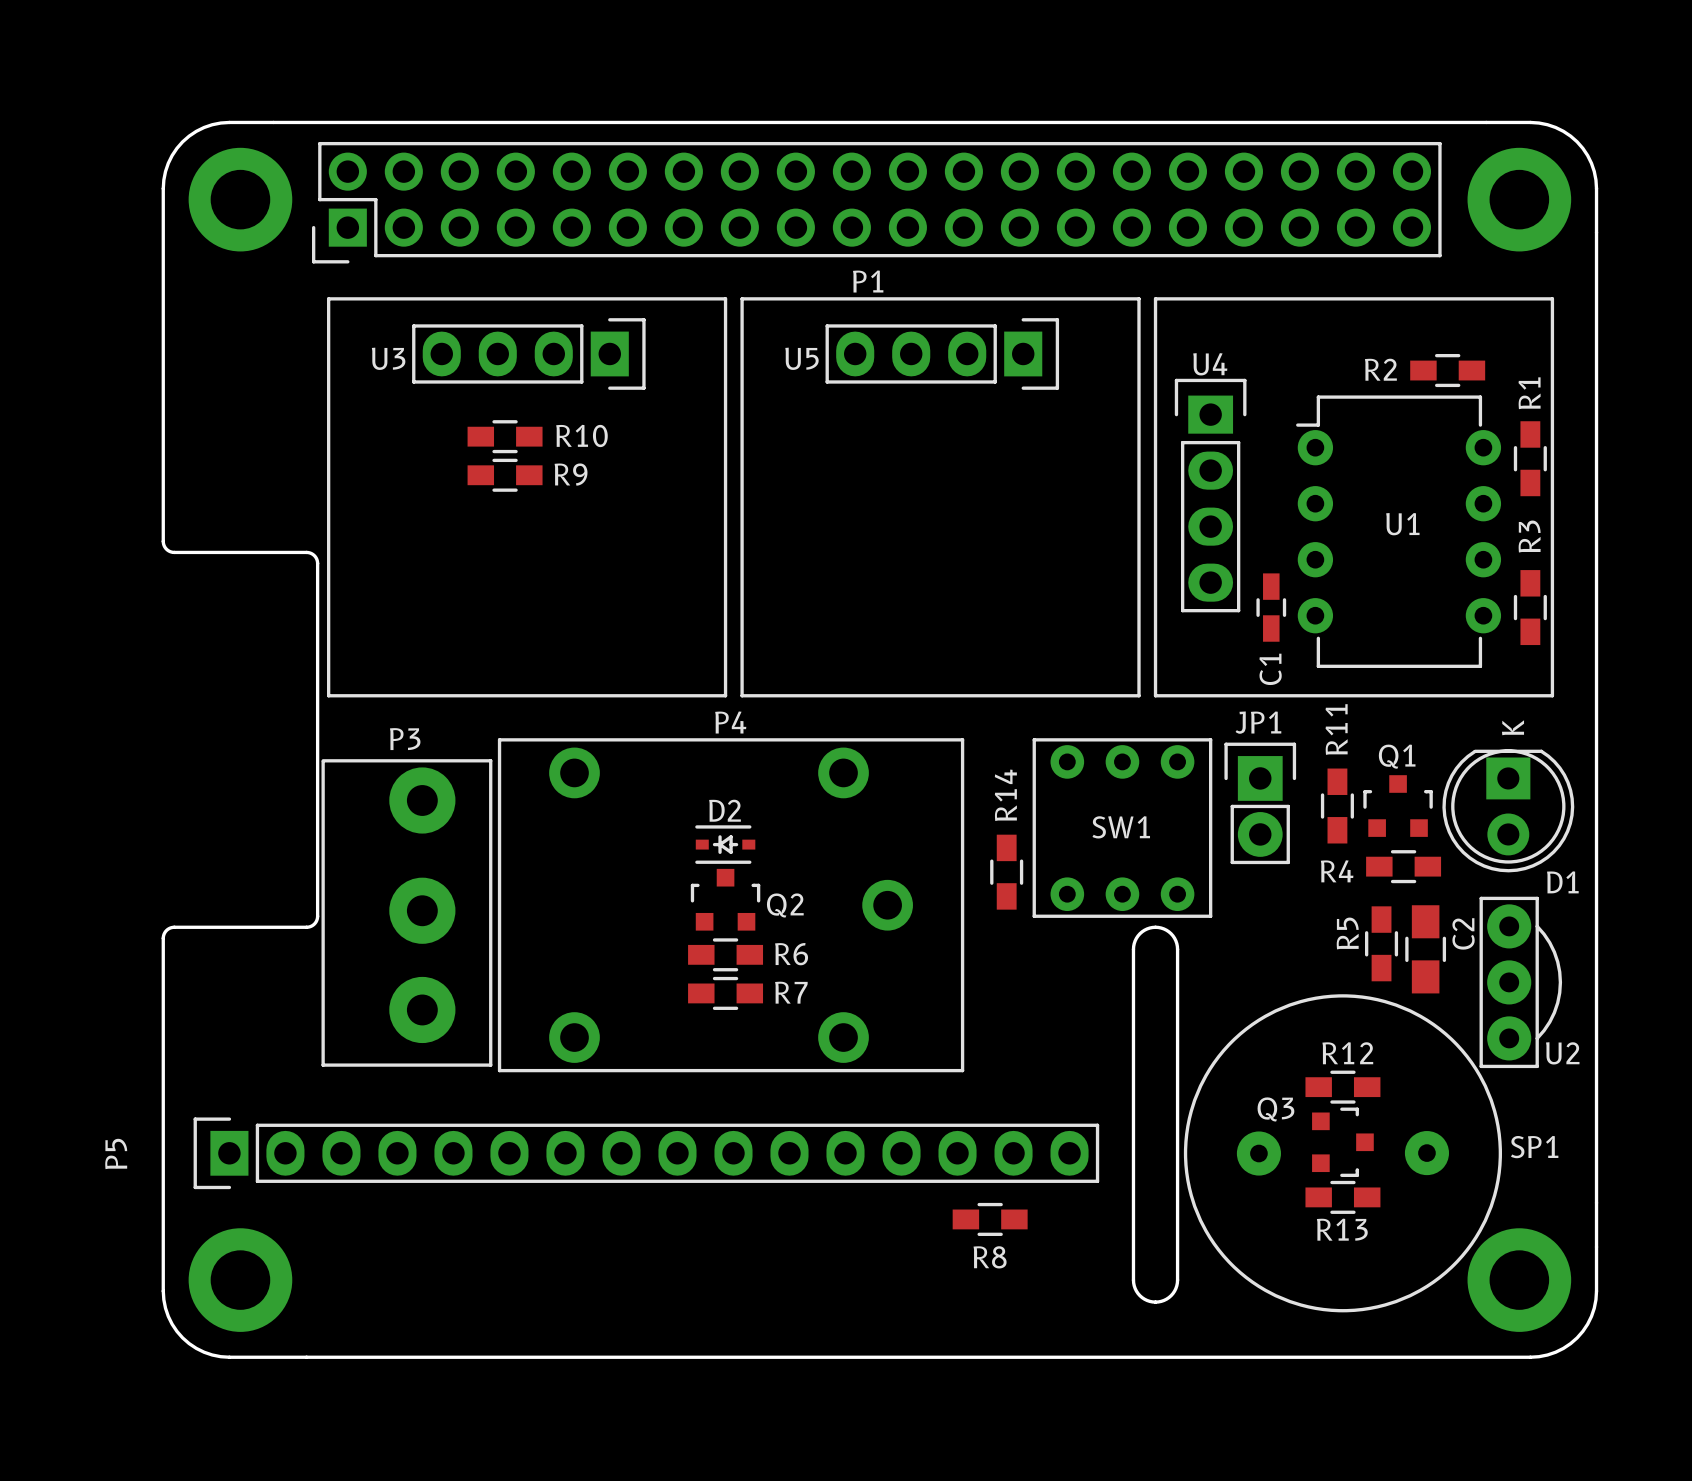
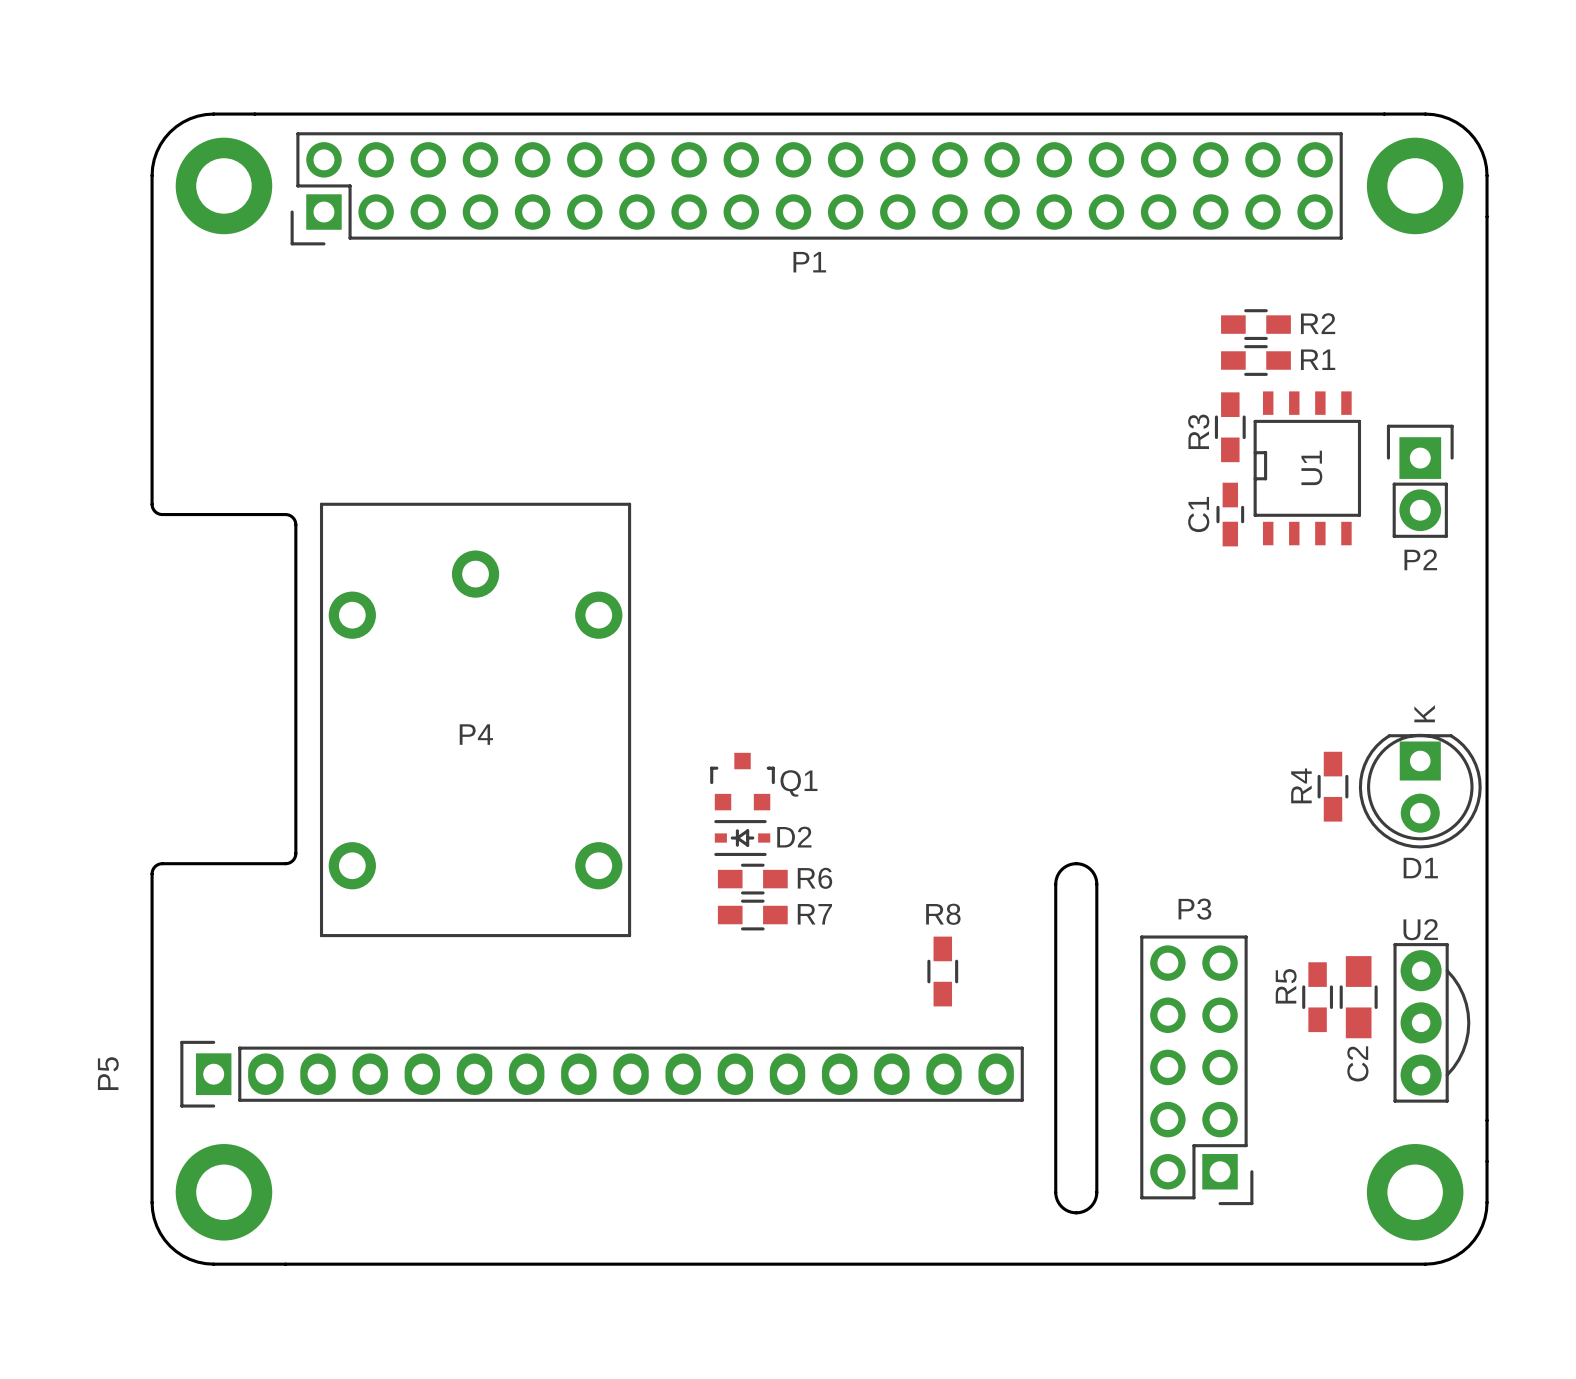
R2 name position: R2 (1380, 369) -> R2 (1318, 323)
R2 position: (1447, 370) -> (1255, 324)
U1 footprint: [1296, 395, 1502, 668] -> [1253, 391, 1362, 546]
R10: (505, 436) -> none
R1 rotation: 0° (1530, 458) -> 90° clockwise (1255, 360)
R1 position: (1530, 458) -> (1255, 360)
R9: (505, 475) -> none
U3: (527, 497) -> none
U5: (940, 497) -> none
U4: (1353, 497) -> none
P2: none -> (1420, 481)
R3 name position: R3 (1529, 536) -> R3 (1198, 431)
C1 position: (1271, 607) -> (1230, 514)
R3 position: (1530, 607) -> (1230, 427)
C1 name position: C1 (1270, 669) -> C1 (1198, 514)
P4 name position: P4 (730, 722) -> P4 (476, 734)
Q1 name position: Q1 (1397, 756) -> Q1 (798, 783)
P3 footprint: [321, 759, 493, 1067] -> [1140, 935, 1254, 1206]
JP1: (1260, 803) -> none
R11: (1337, 806) -> none
Q1 position: (1398, 806) -> (742, 781)
D2 name position: D2 (725, 810) -> D2 (794, 837)
D1 position: (1508, 810) -> (1420, 791)
SW1: (1122, 828) -> none
D2 position: (725, 844) -> (742, 838)
R4 rotation: 0° (1403, 866) -> 90° clockwise (1333, 786)
R14: (1006, 872) -> none
D1 name position: D1 (1562, 882) -> D1 (1420, 868)
Q2: (725, 899) -> none
P4 rotation: 0° (731, 905) -> 90° counterclockwise (475, 719)
C2 name position: C2 (1463, 933) -> C2 (1357, 1063)
R5 position: (1381, 943) -> (1317, 997)
C2 position: (1425, 949) -> (1358, 997)
R6 position: (725, 954) -> (752, 879)
U2 position: (1520, 982) -> (1431, 1022)
R7 position: (725, 993) -> (752, 915)
U2 name position: U2 (1562, 1053) -> U2 (1420, 929)
R12: (1342, 1087) -> none
Q3: (1342, 1142) -> none
SP1: (1342, 1153) -> none
R13: (1342, 1197) -> none
R8 rotation: 0° (990, 1219) -> 90° clockwise (942, 971)
R8 position: (990, 1219) -> (942, 971)
R8 name position: R8 (990, 1257) -> R8 (943, 914)

